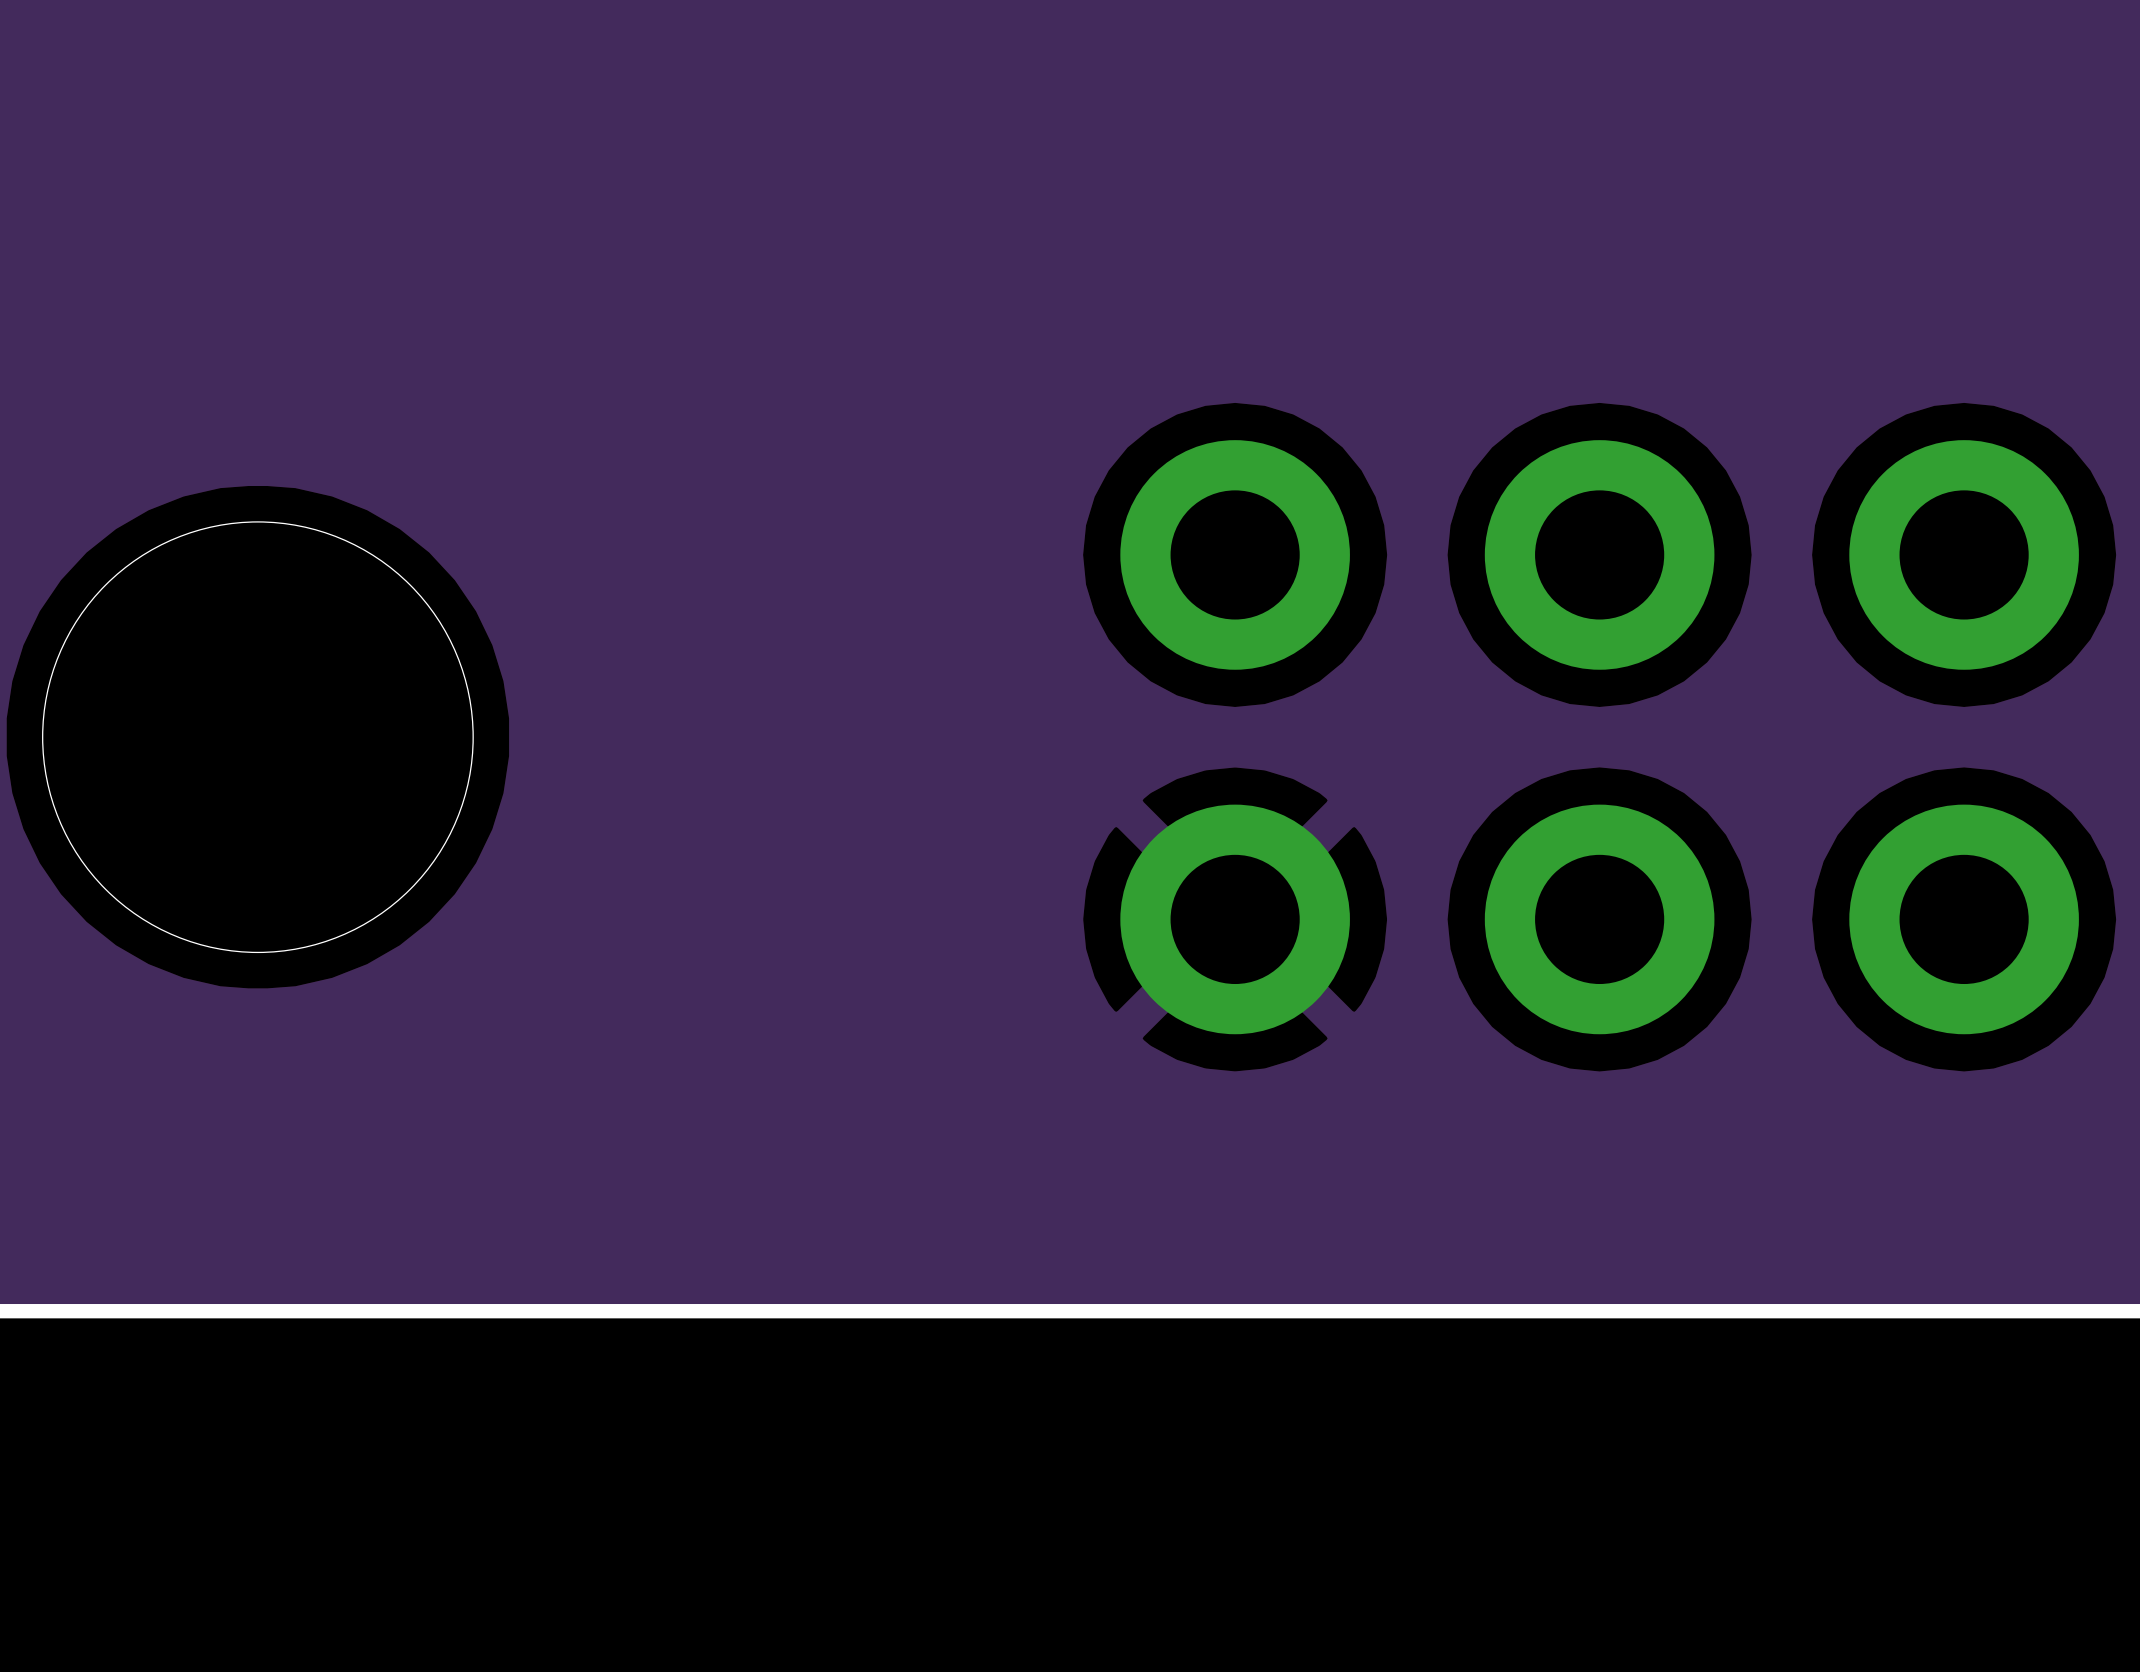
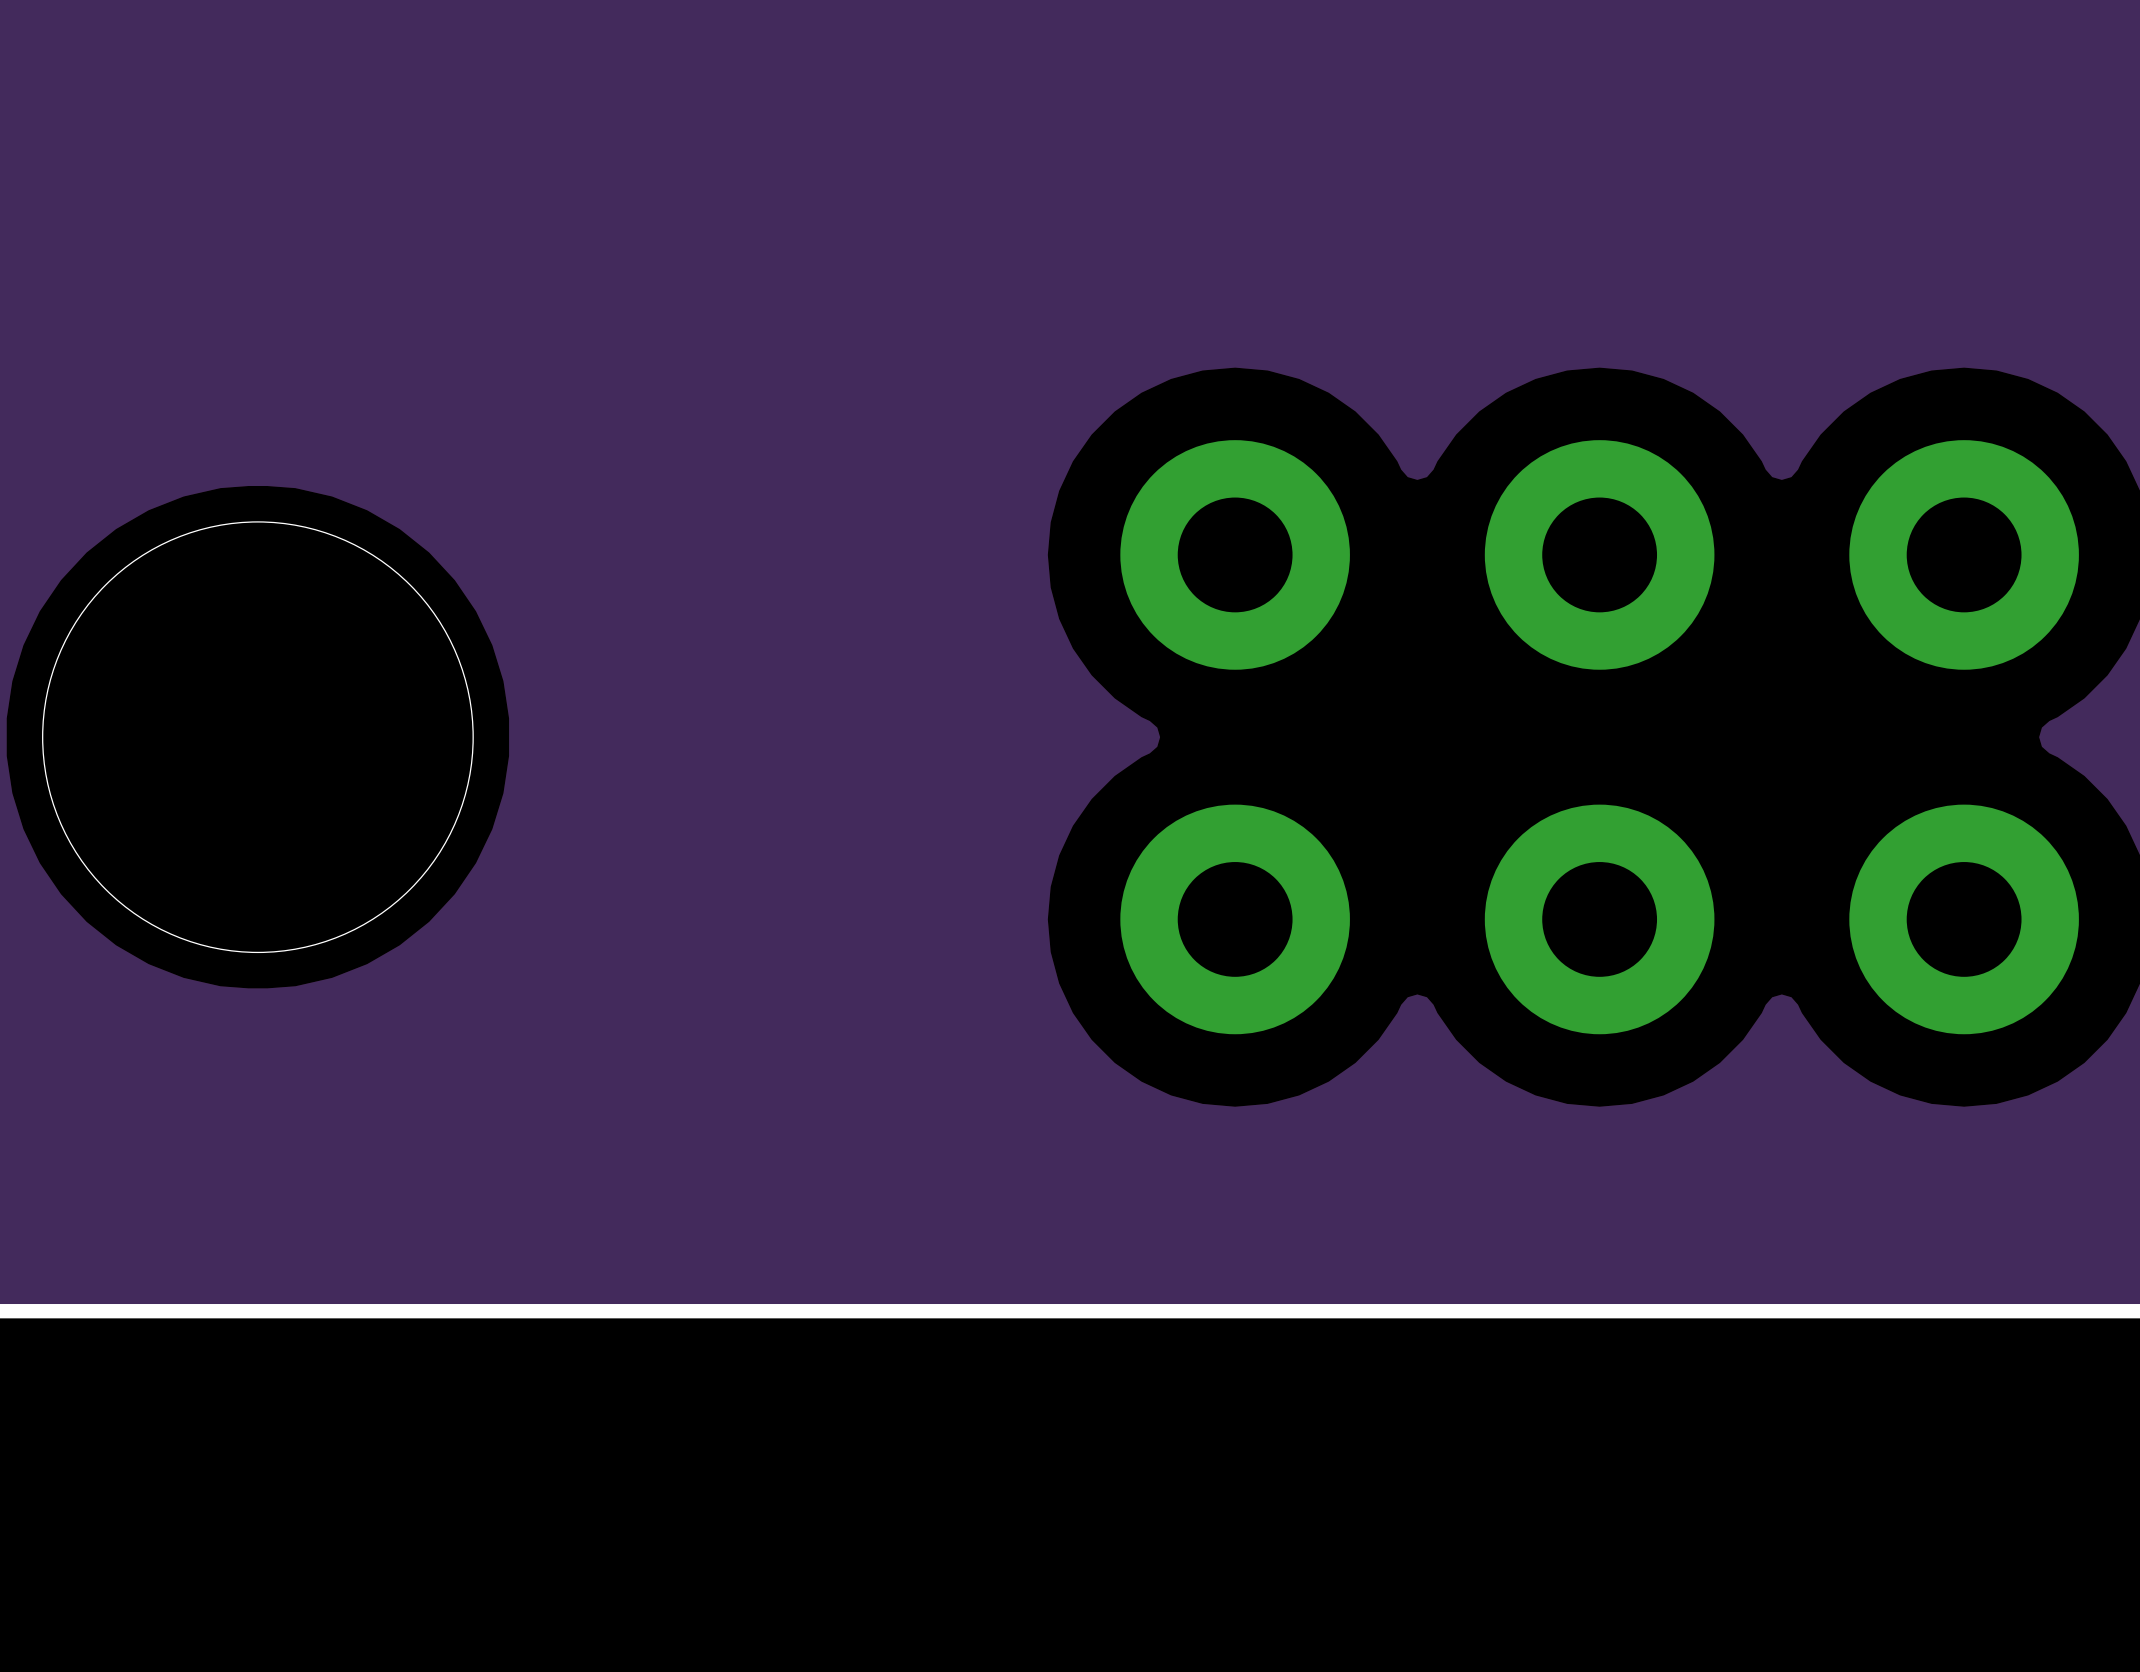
part footprint: [1120, 440, 2079, 1035] -> [1120, 440, 2079, 1035]

